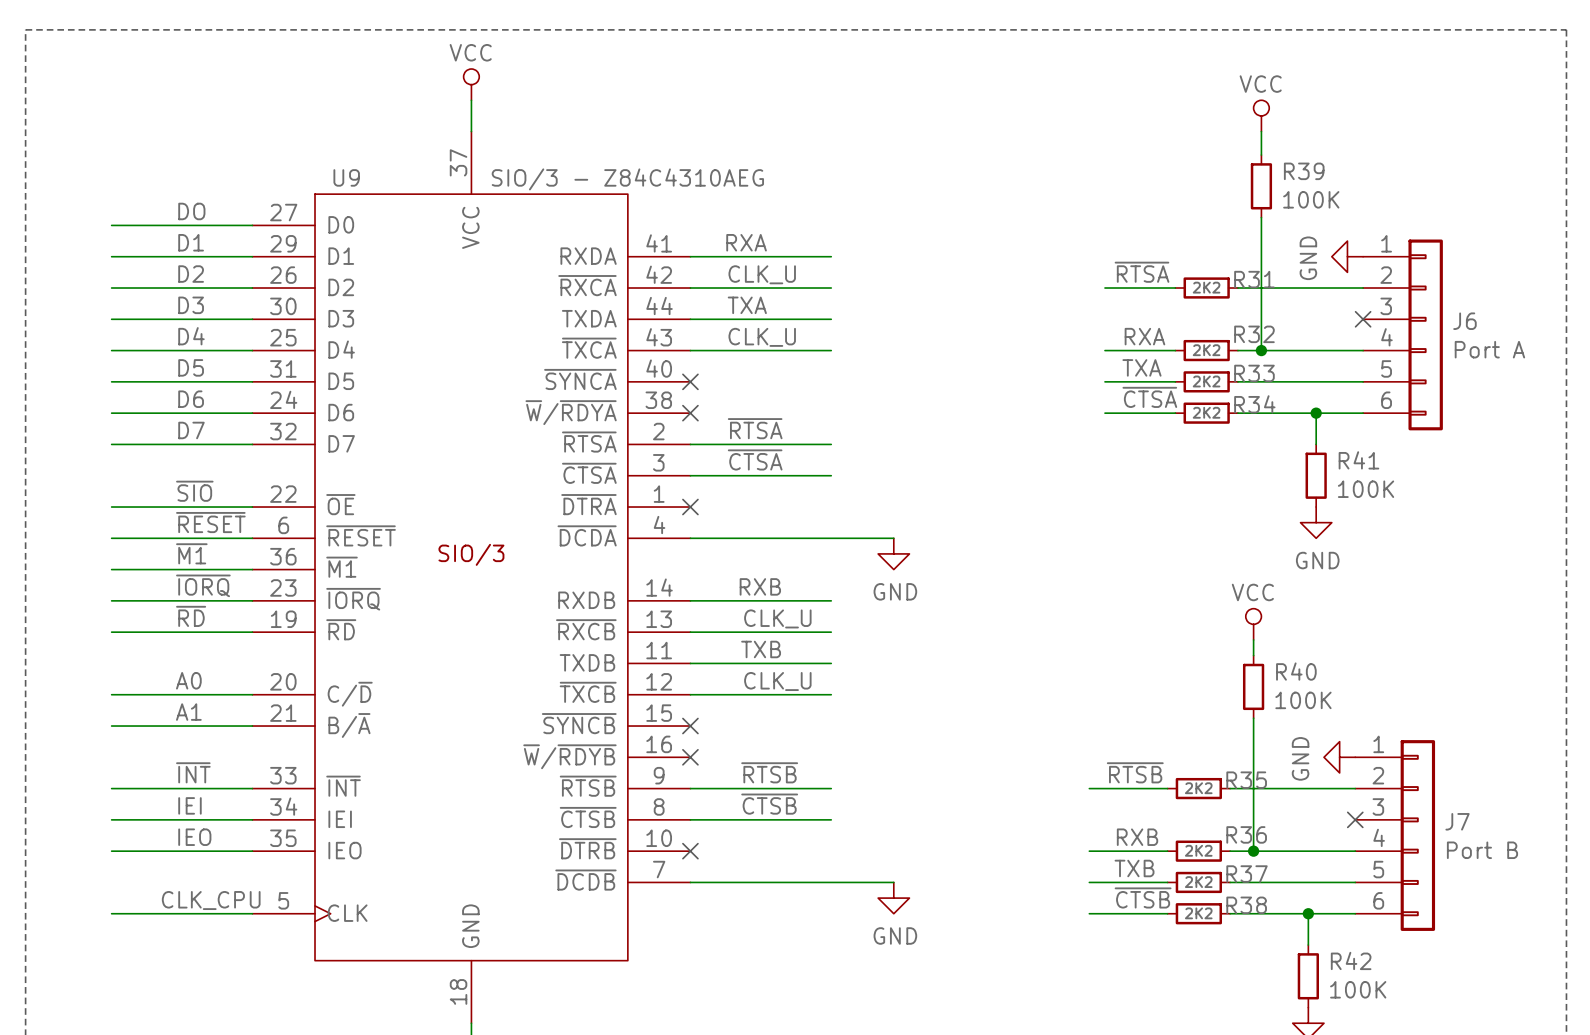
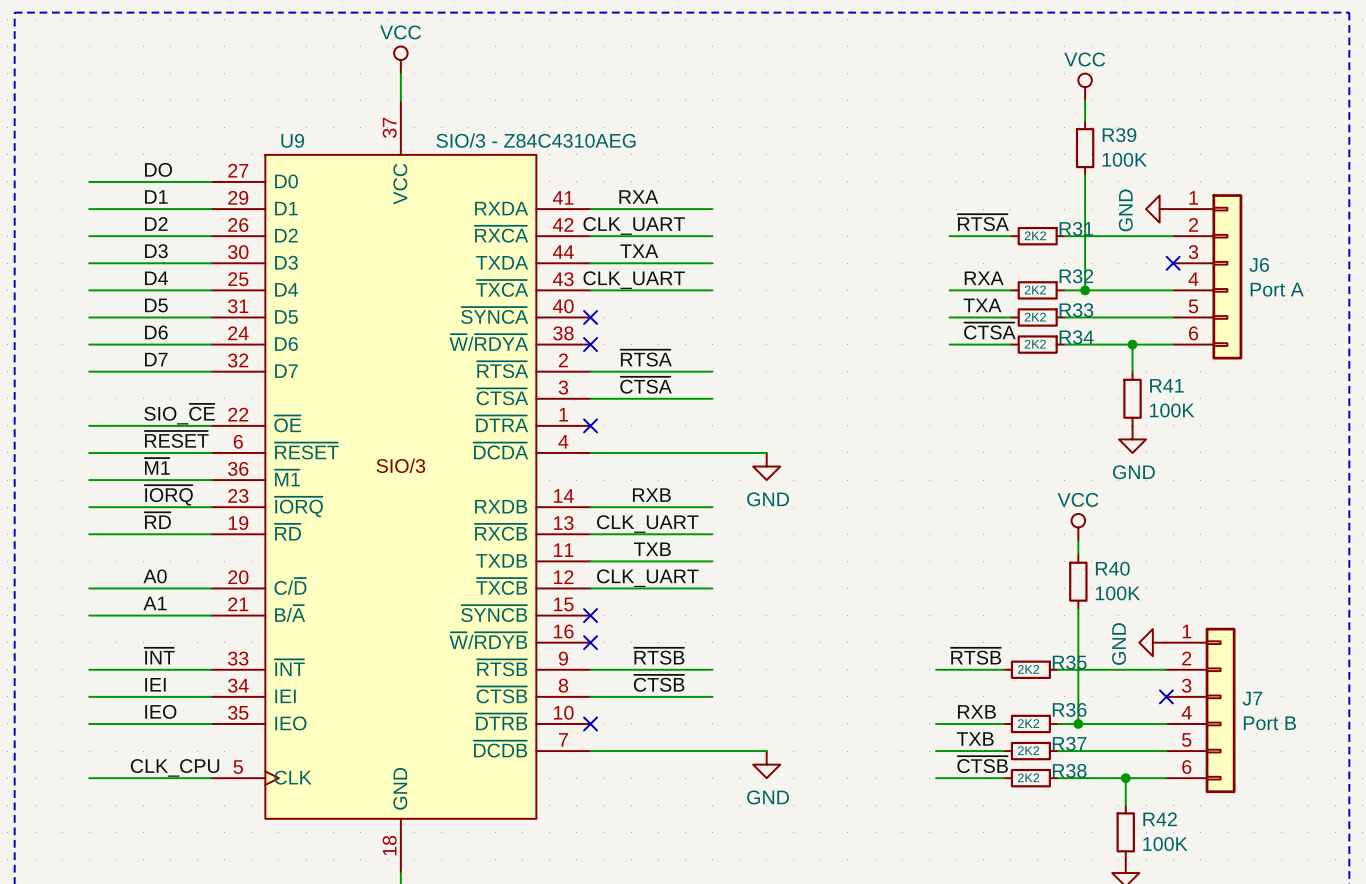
label: CLK_U (762, 274) -> CLK_UART (634, 225)
label: CLK_U (762, 337) -> CLK_UART (634, 280)
label: ~{SIO} (194, 491) -> SIO_~{CE} (179, 414)
label: CLK_U (777, 618) -> CLK_UART (647, 524)
label: CLK_U (777, 681) -> CLK_UART (647, 578)

